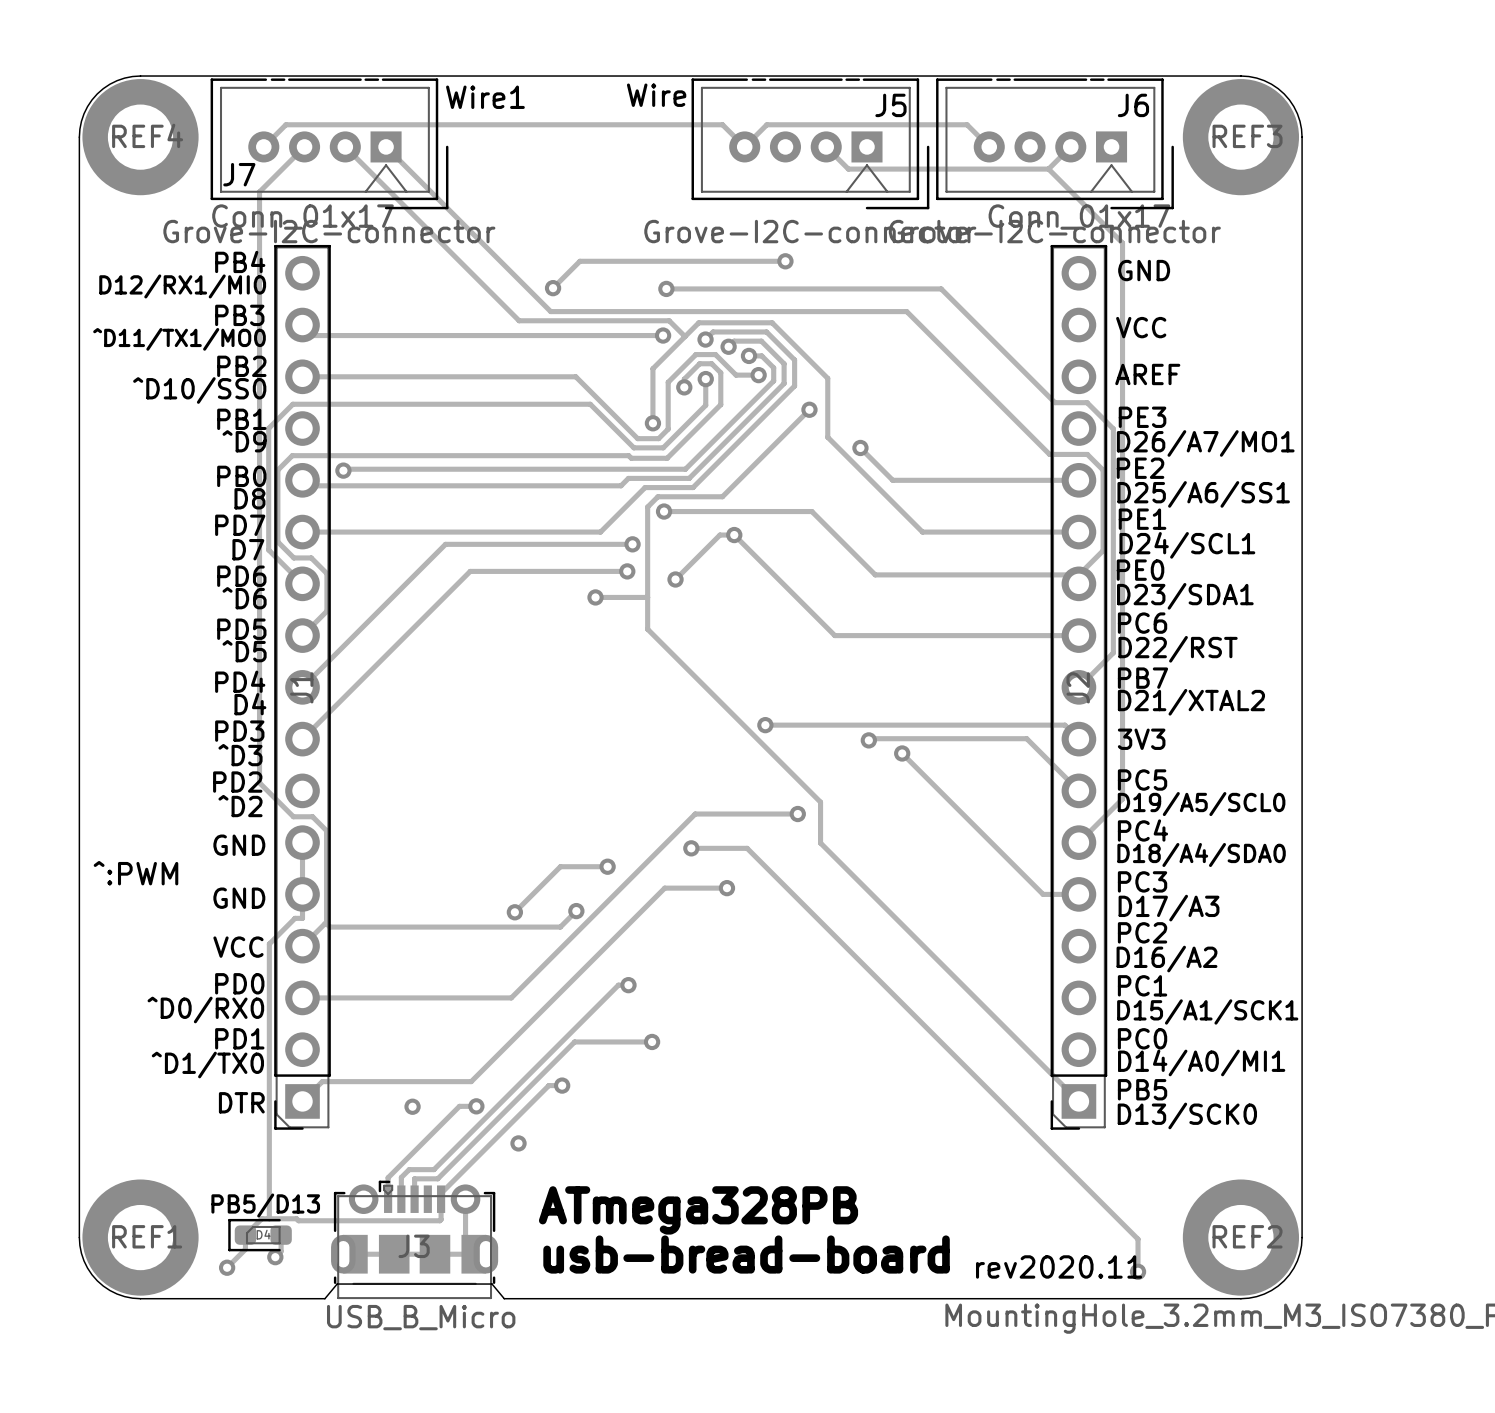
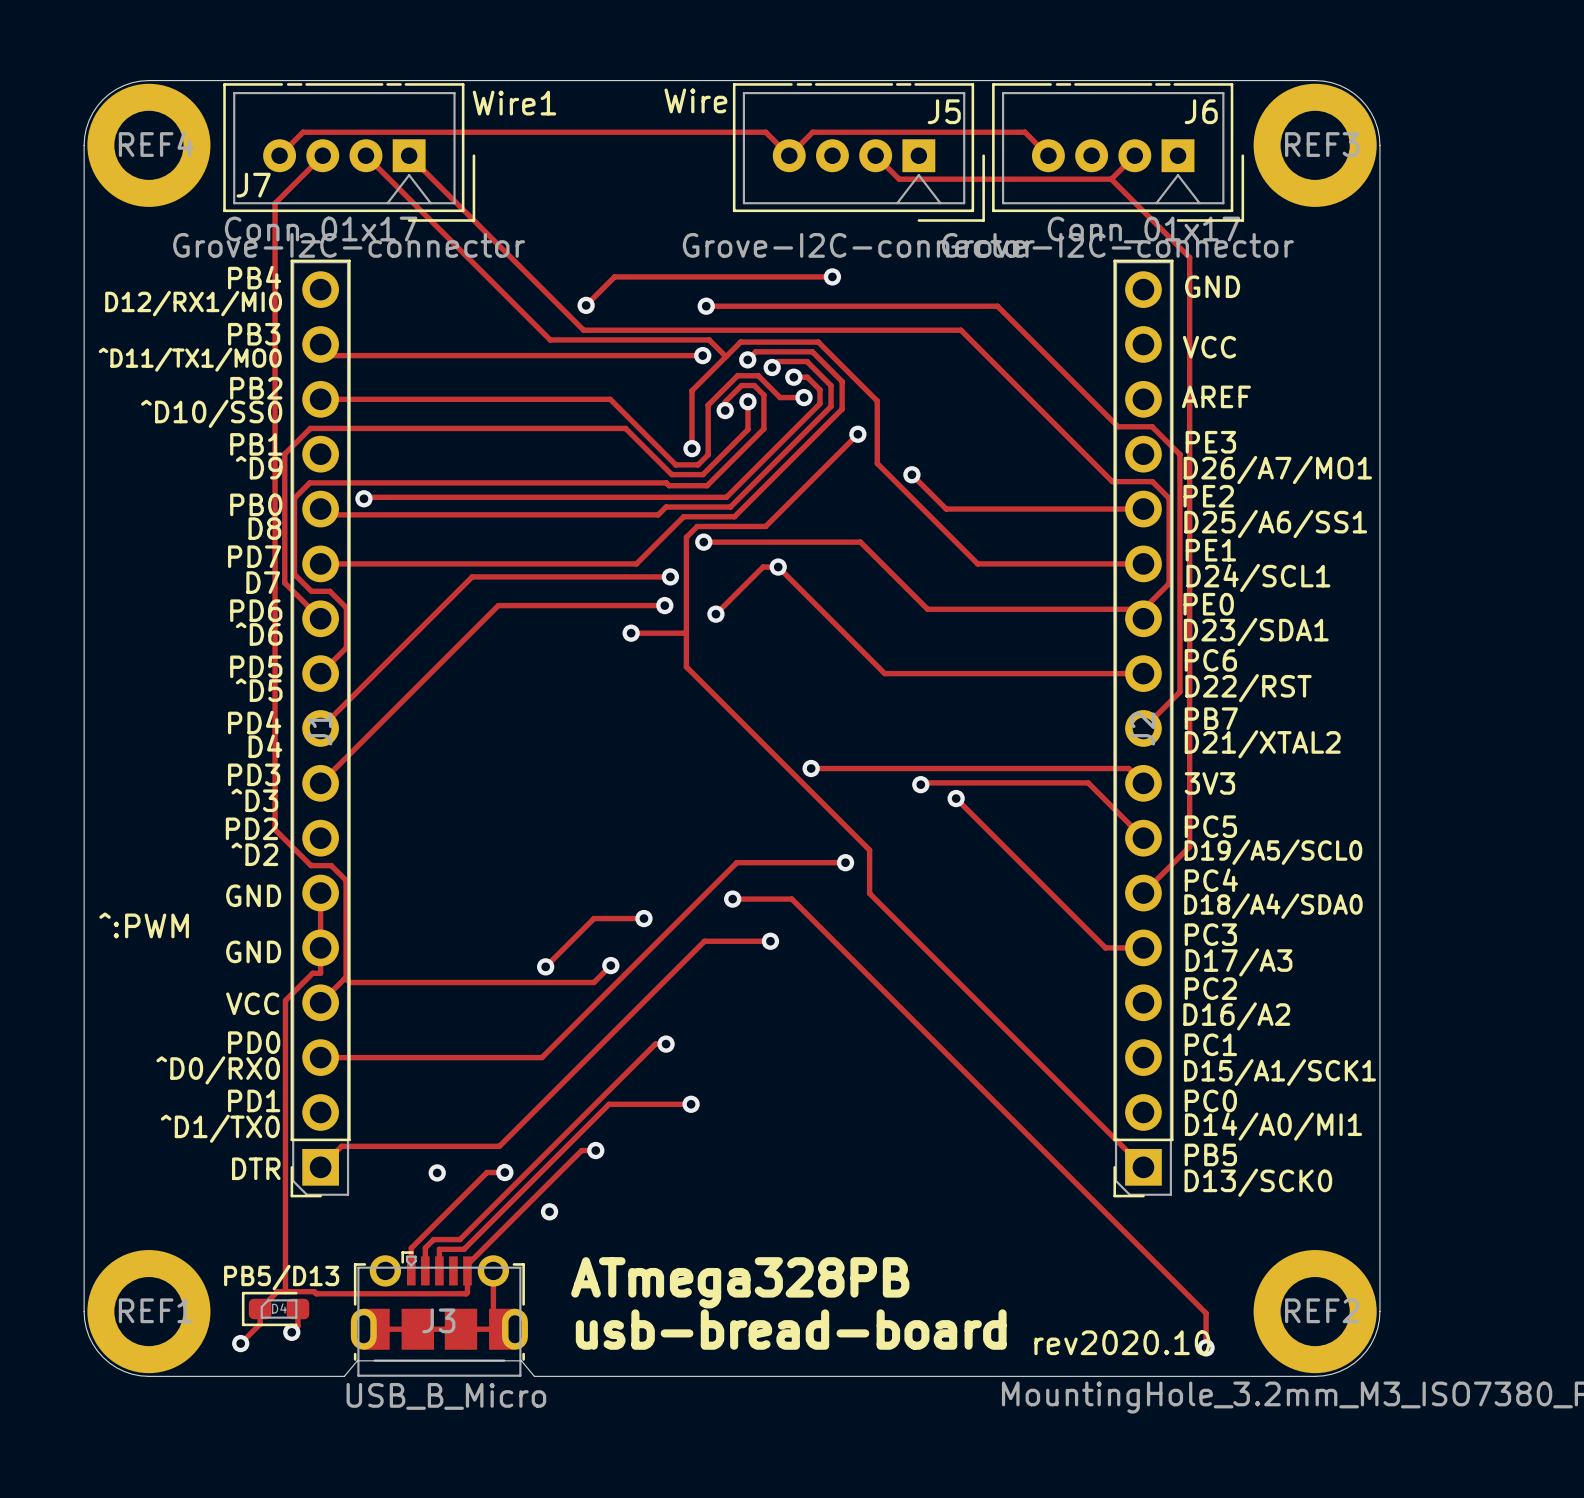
text: rev2020.11 (1059, 1266) -> rev2020.10 (1122, 1342)

